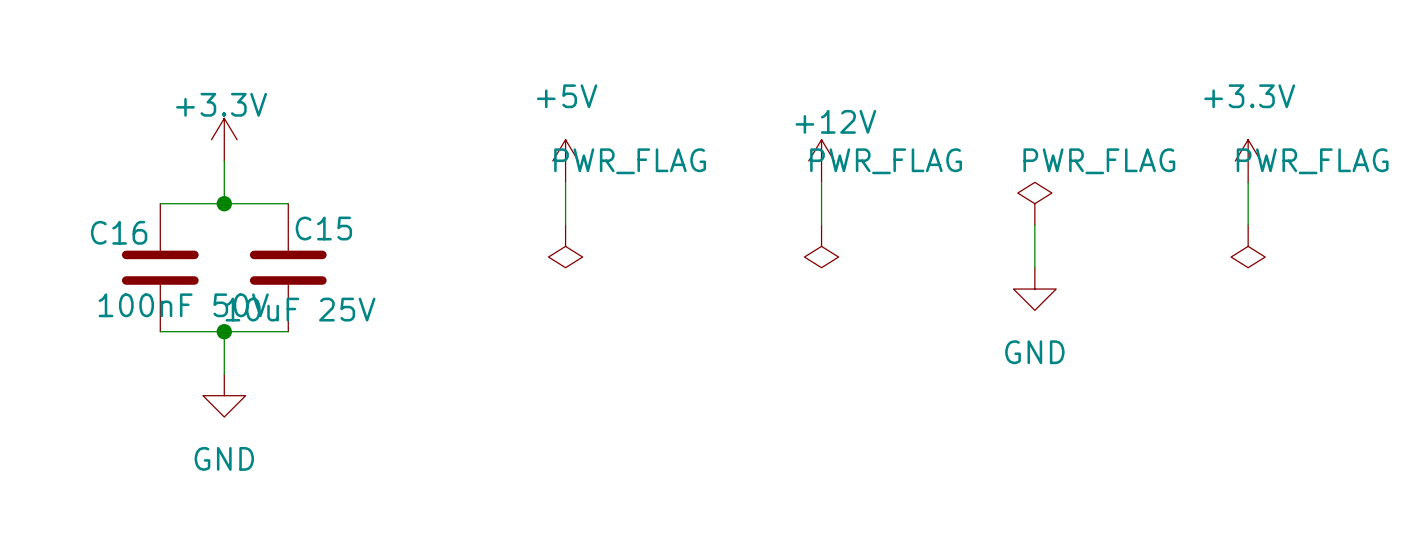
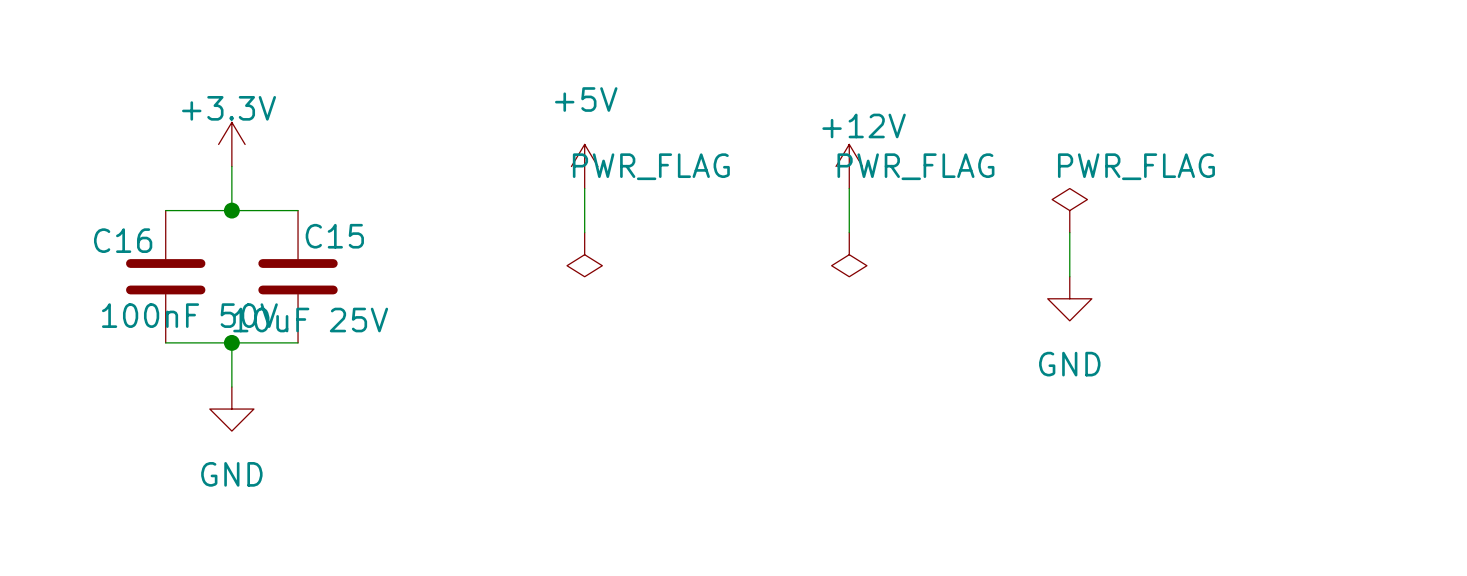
power symbol: +3.3V (1248, 161) -> none
wire: (1248, 182) (1248, 225) -> none
power symbol: PWR_FLAG (1248, 246) -> none

